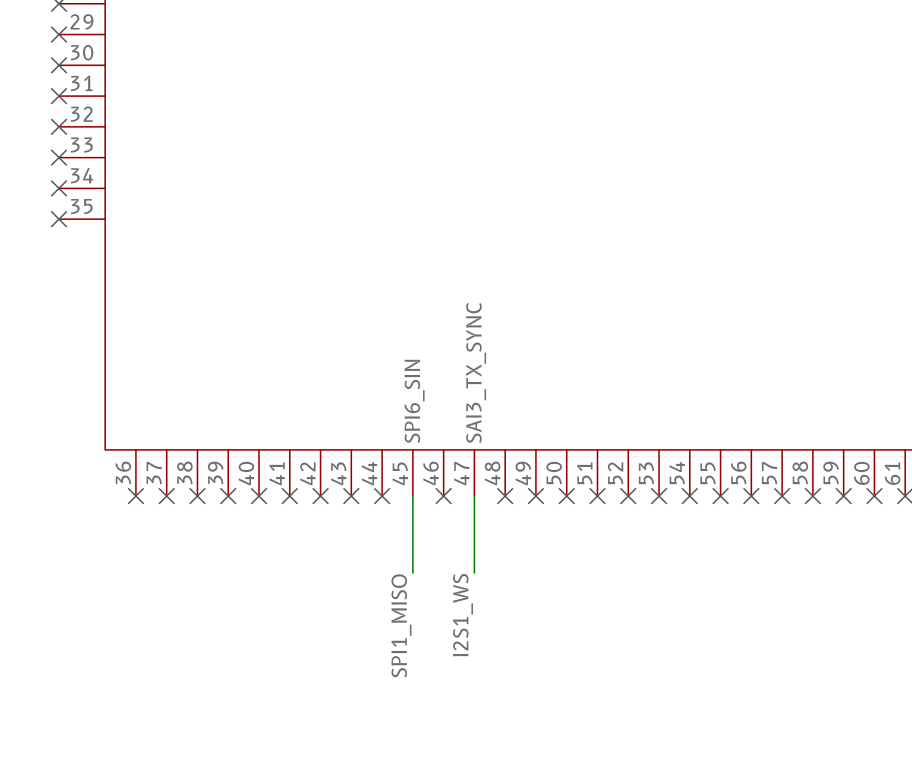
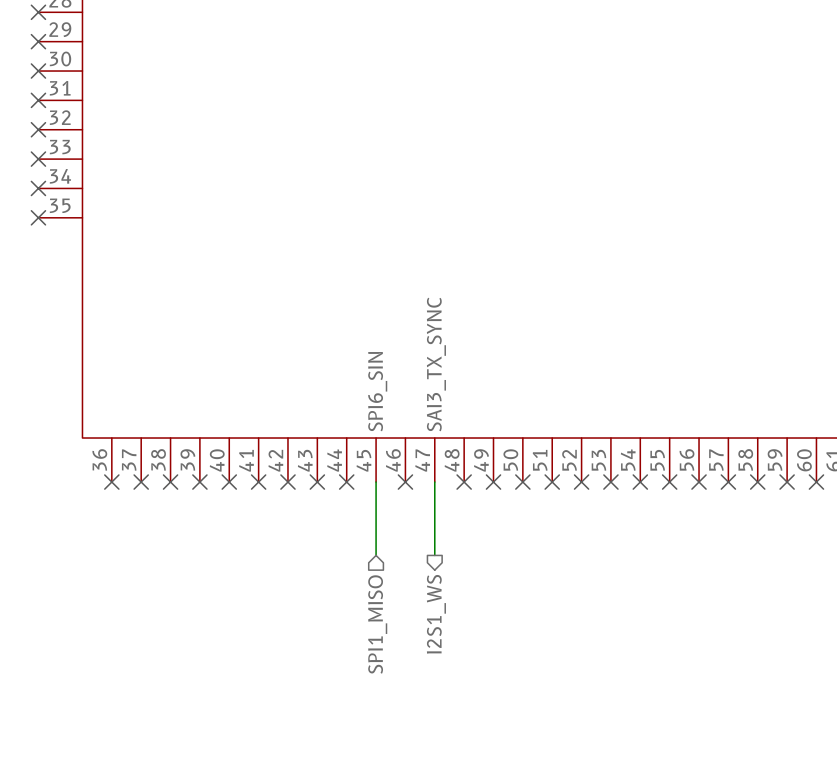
label: I2S1_WS (462, 615) -> none
label: SPI1_MISO (401, 625) -> none
hierarchical label: none -> I2S1_WS (436, 614)
hierarchical label: none -> SPI1_MISO (377, 624)

